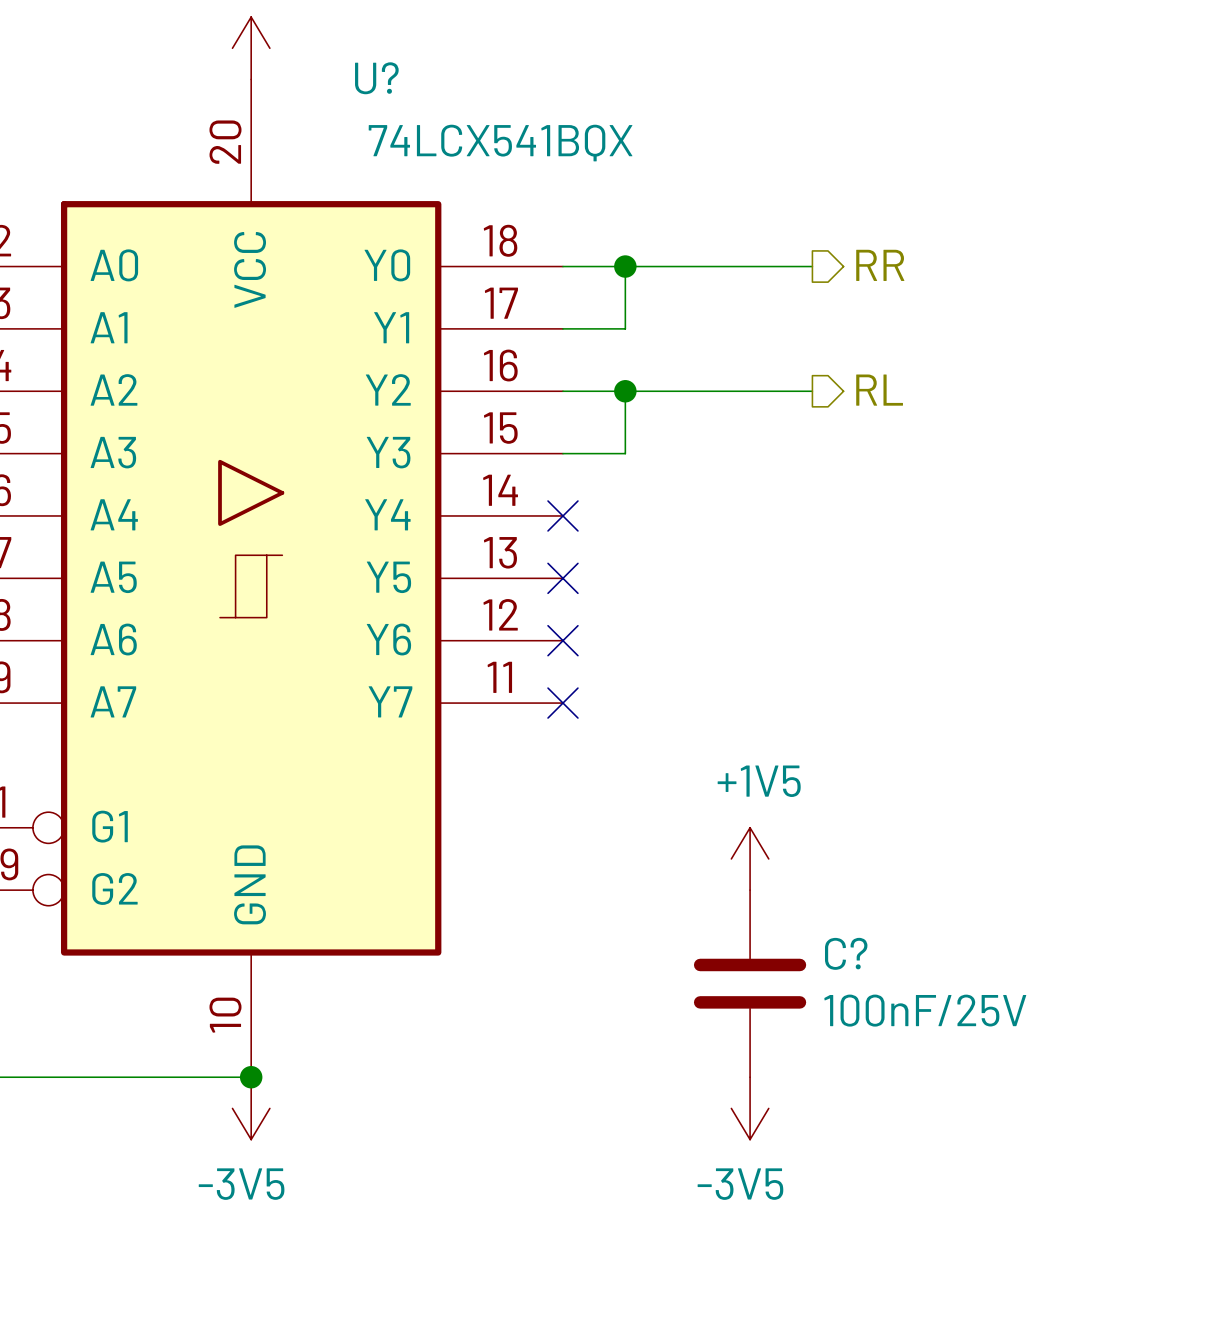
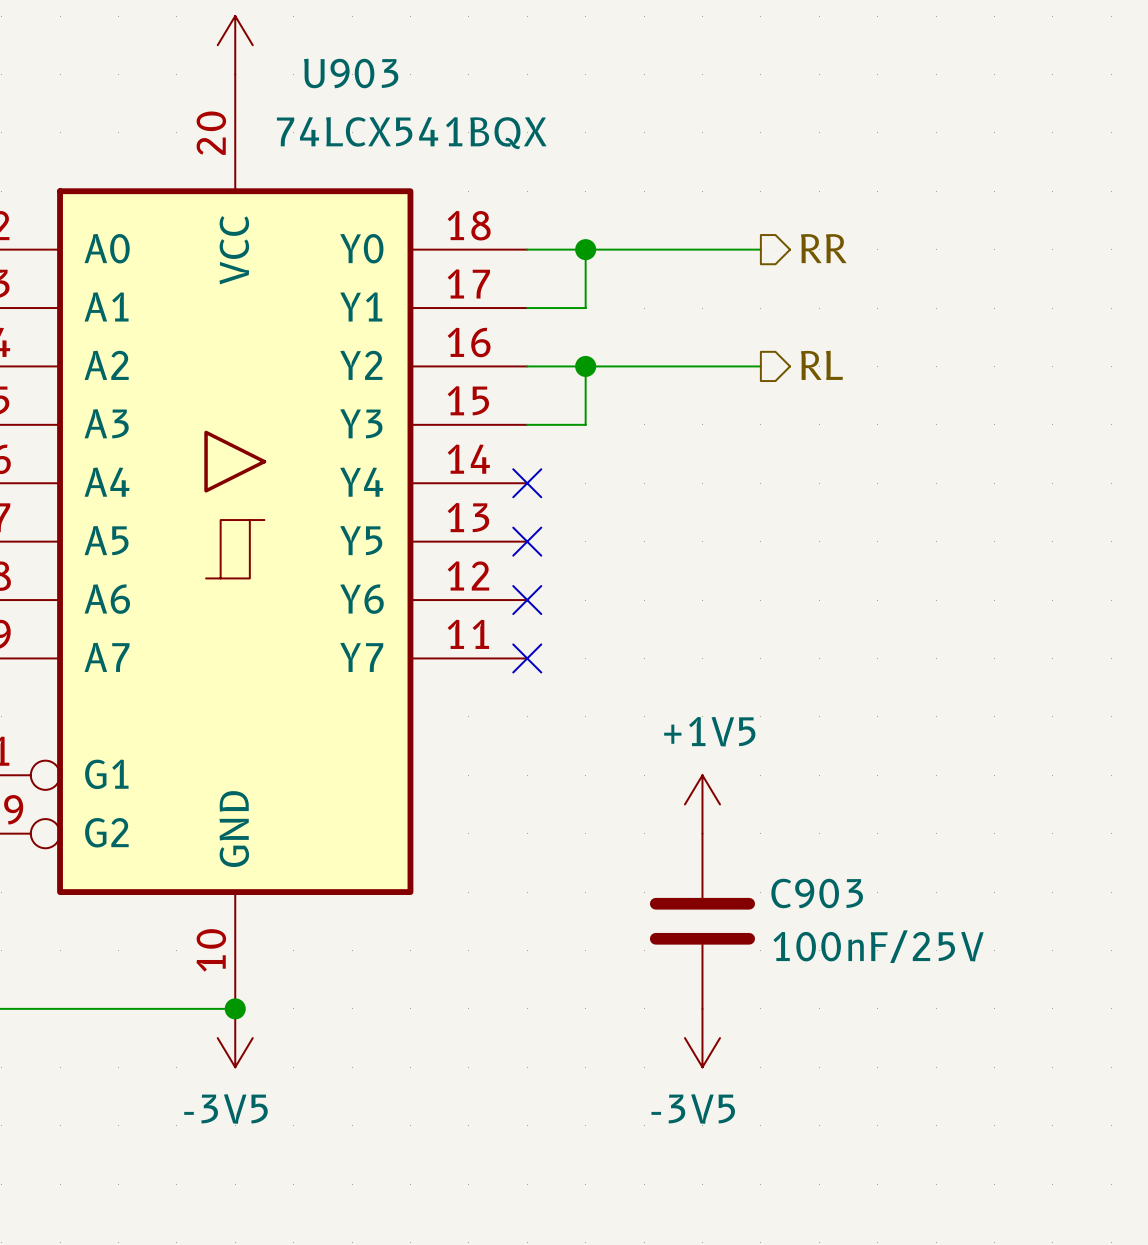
U? name: U? (376, 78) -> U903 (351, 73)
U? value position: 74LCX541BQX (500, 143) -> 74LCX541BQX (411, 133)
C? name: C? (846, 953) -> C903 (817, 893)

